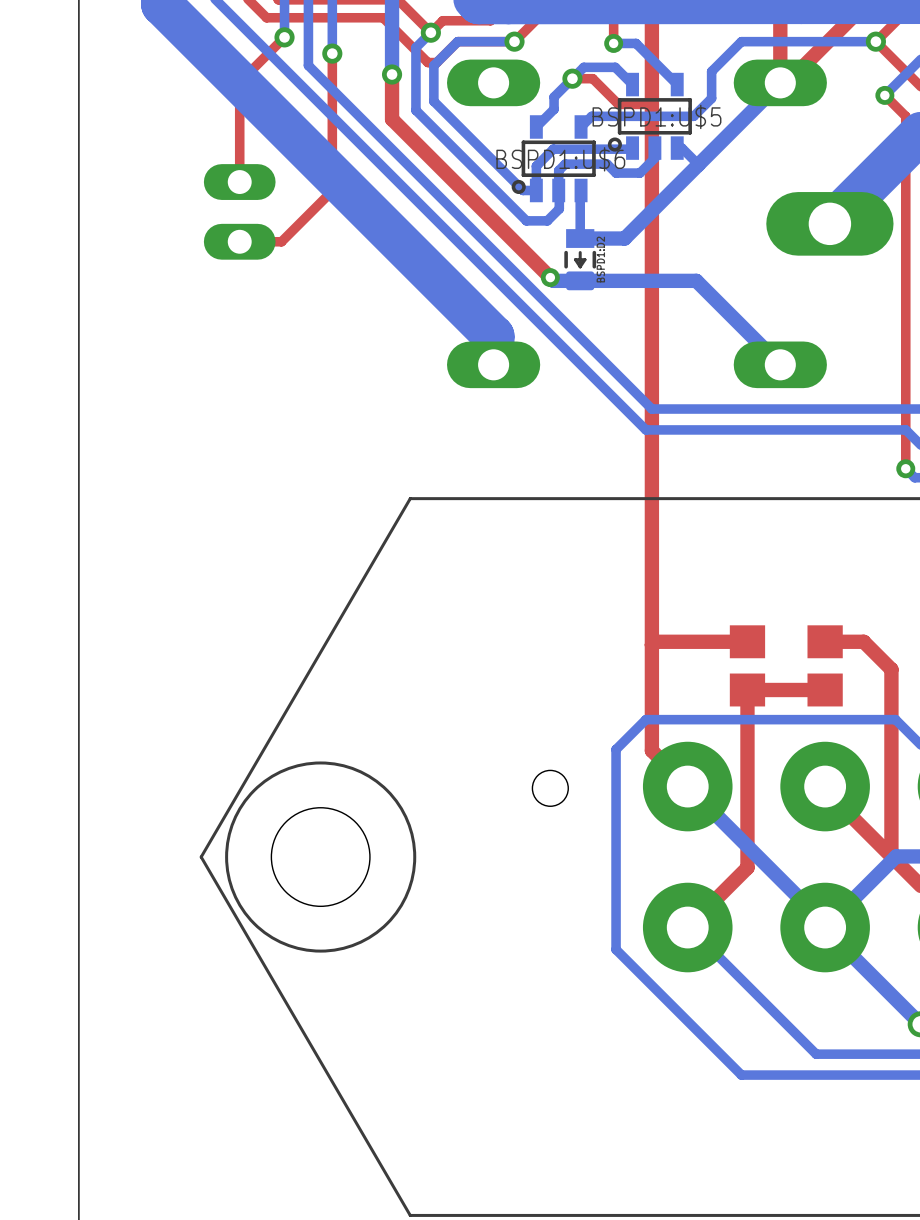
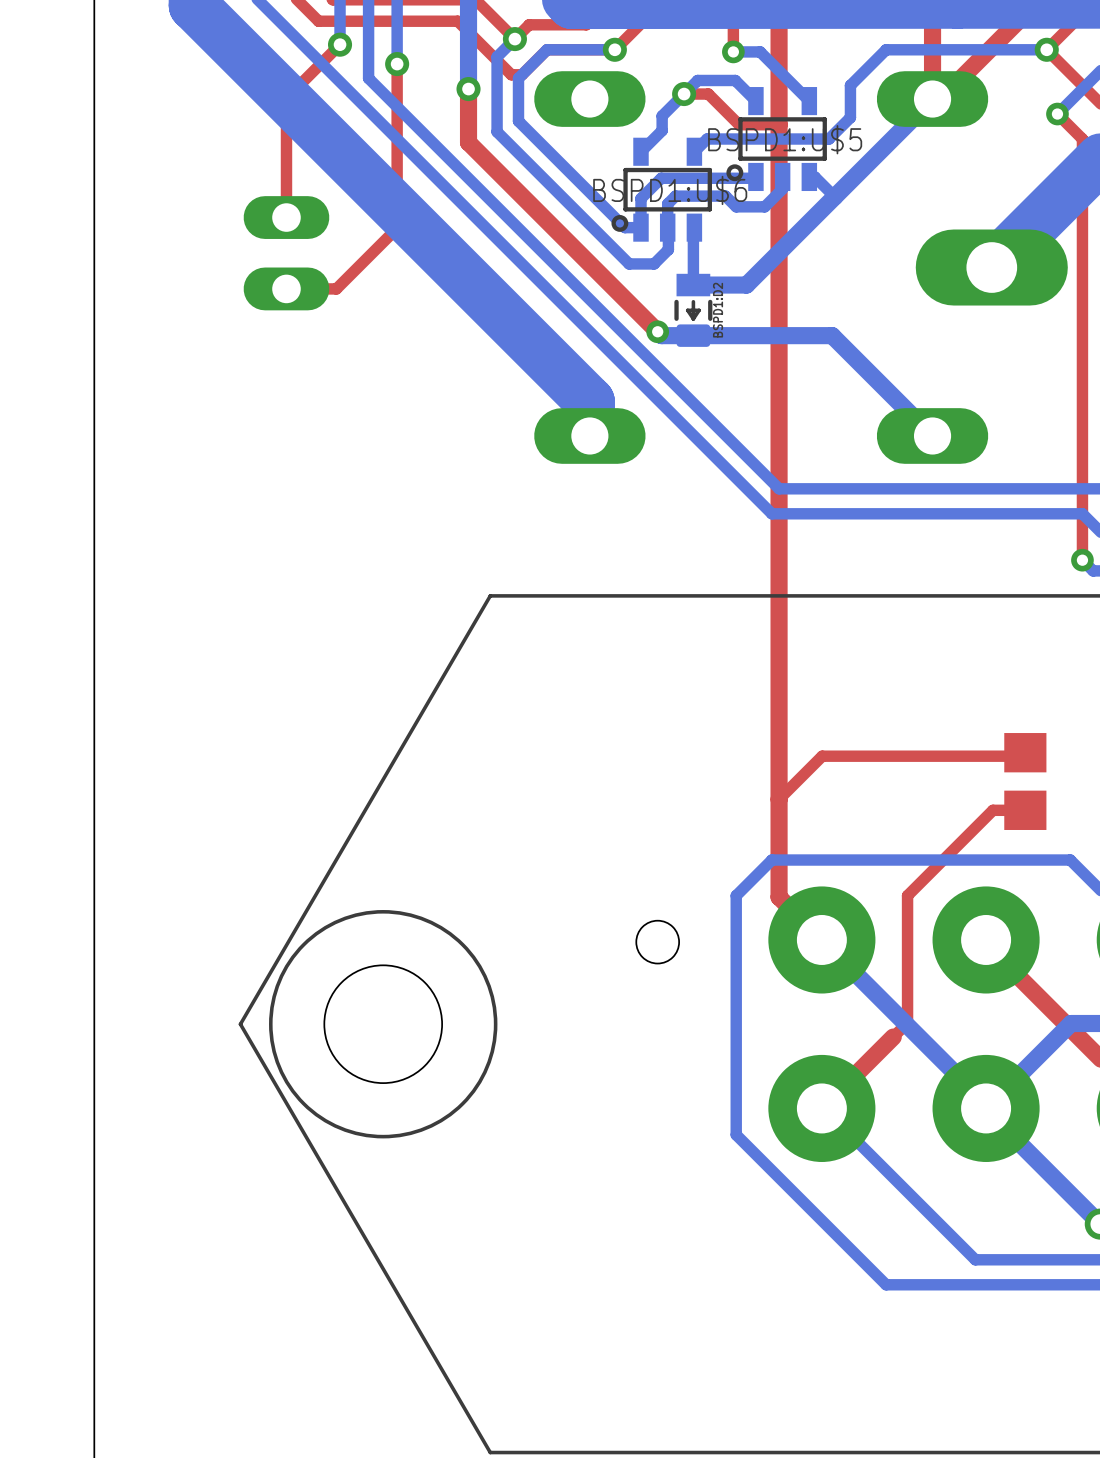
top track: none -> (1025, 752) (1021, 756) (822, 756) (779, 799)
top track: (747, 641) (655, 641) (651, 644) -> none
top track: (825, 641) (863, 641) (891, 669) (891, 856) -> none
part: (747, 665) -> none
part position: (825, 665) -> (1025, 781)
top track: (825, 689) (747, 689) (747, 867) -> (1025, 810) (992, 810) (907, 895) (907, 1022) (893, 1037)

